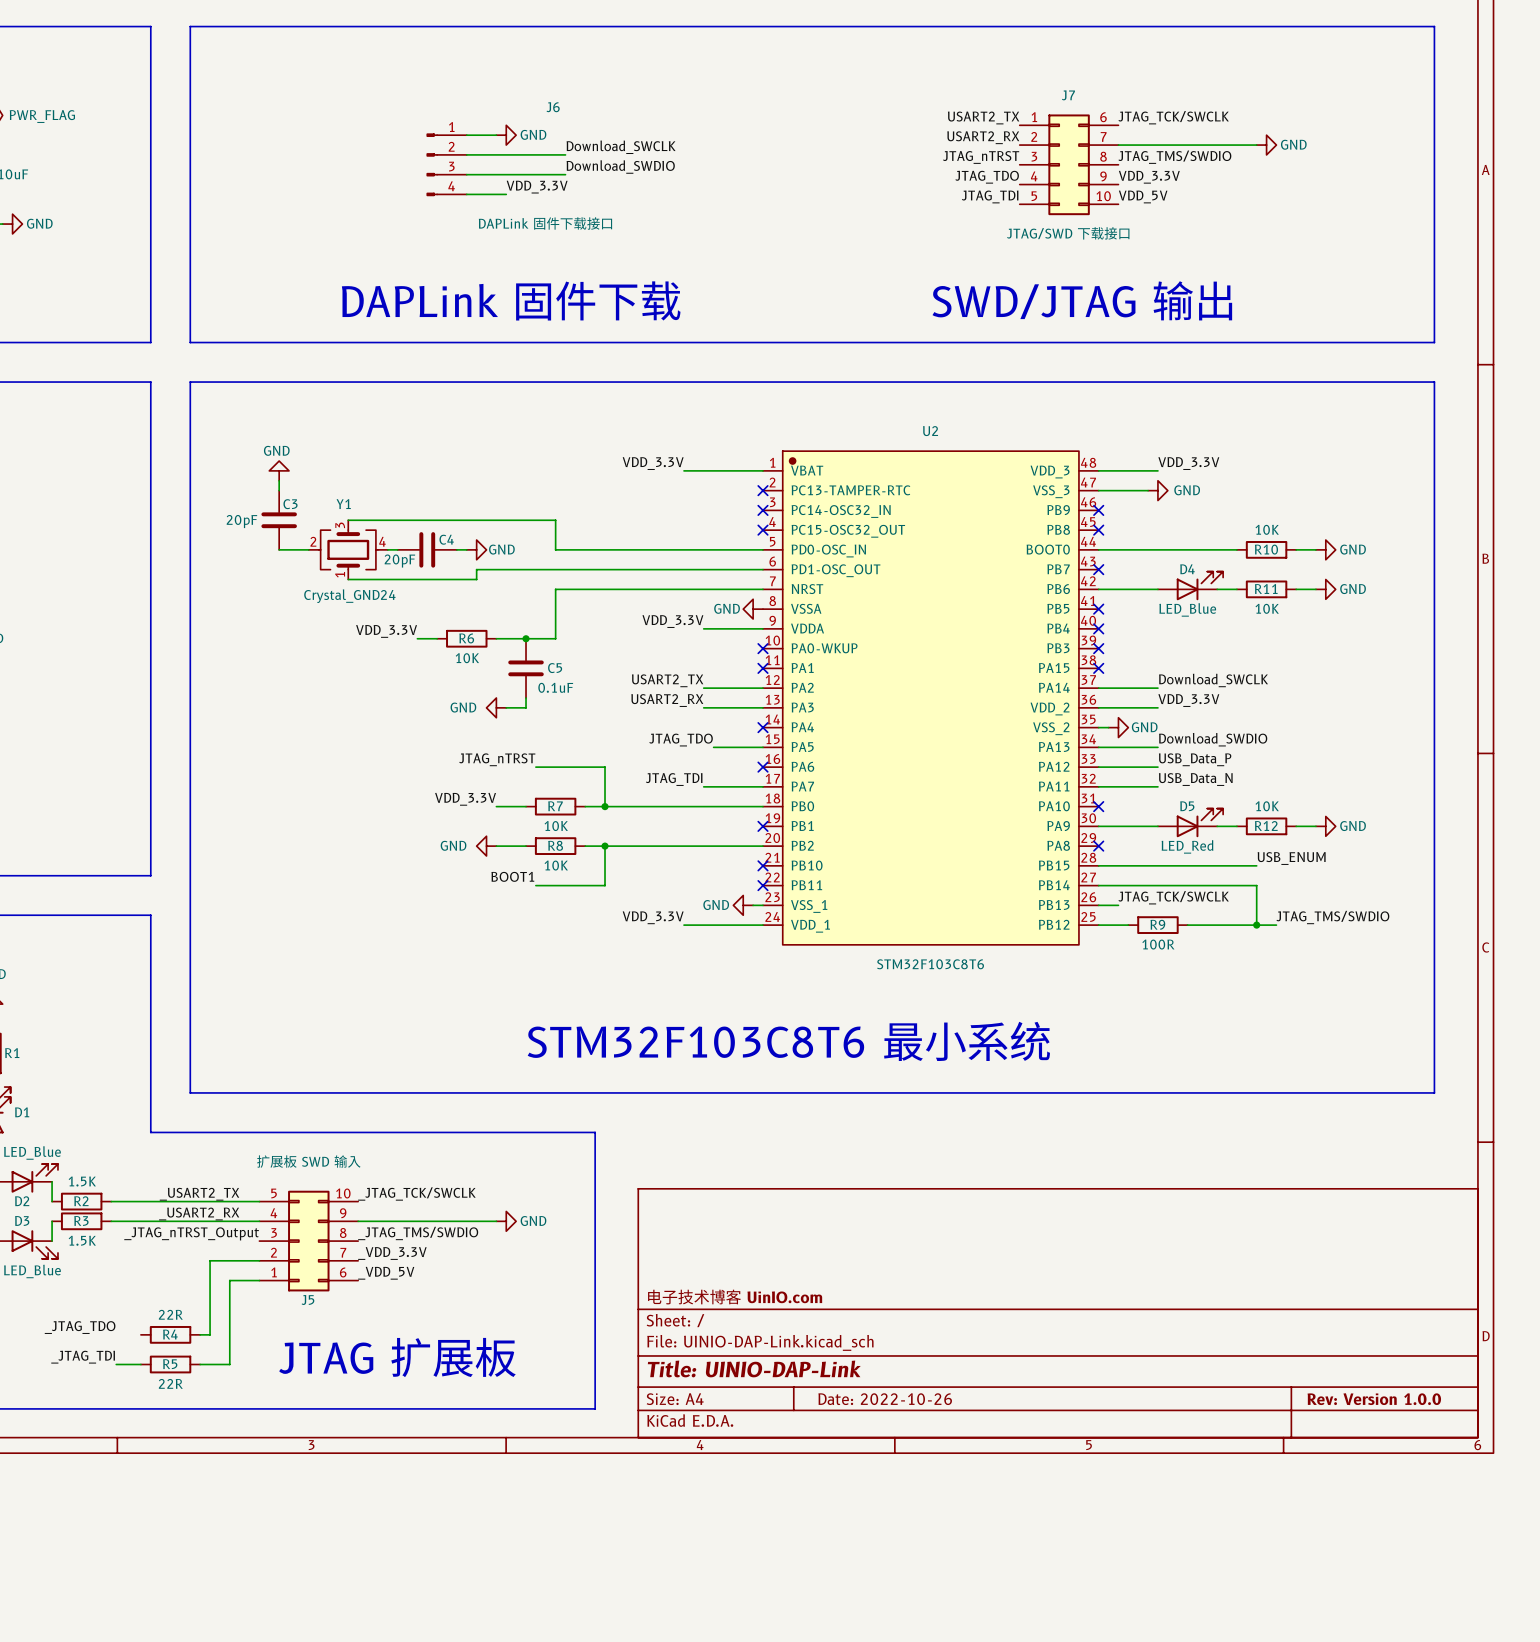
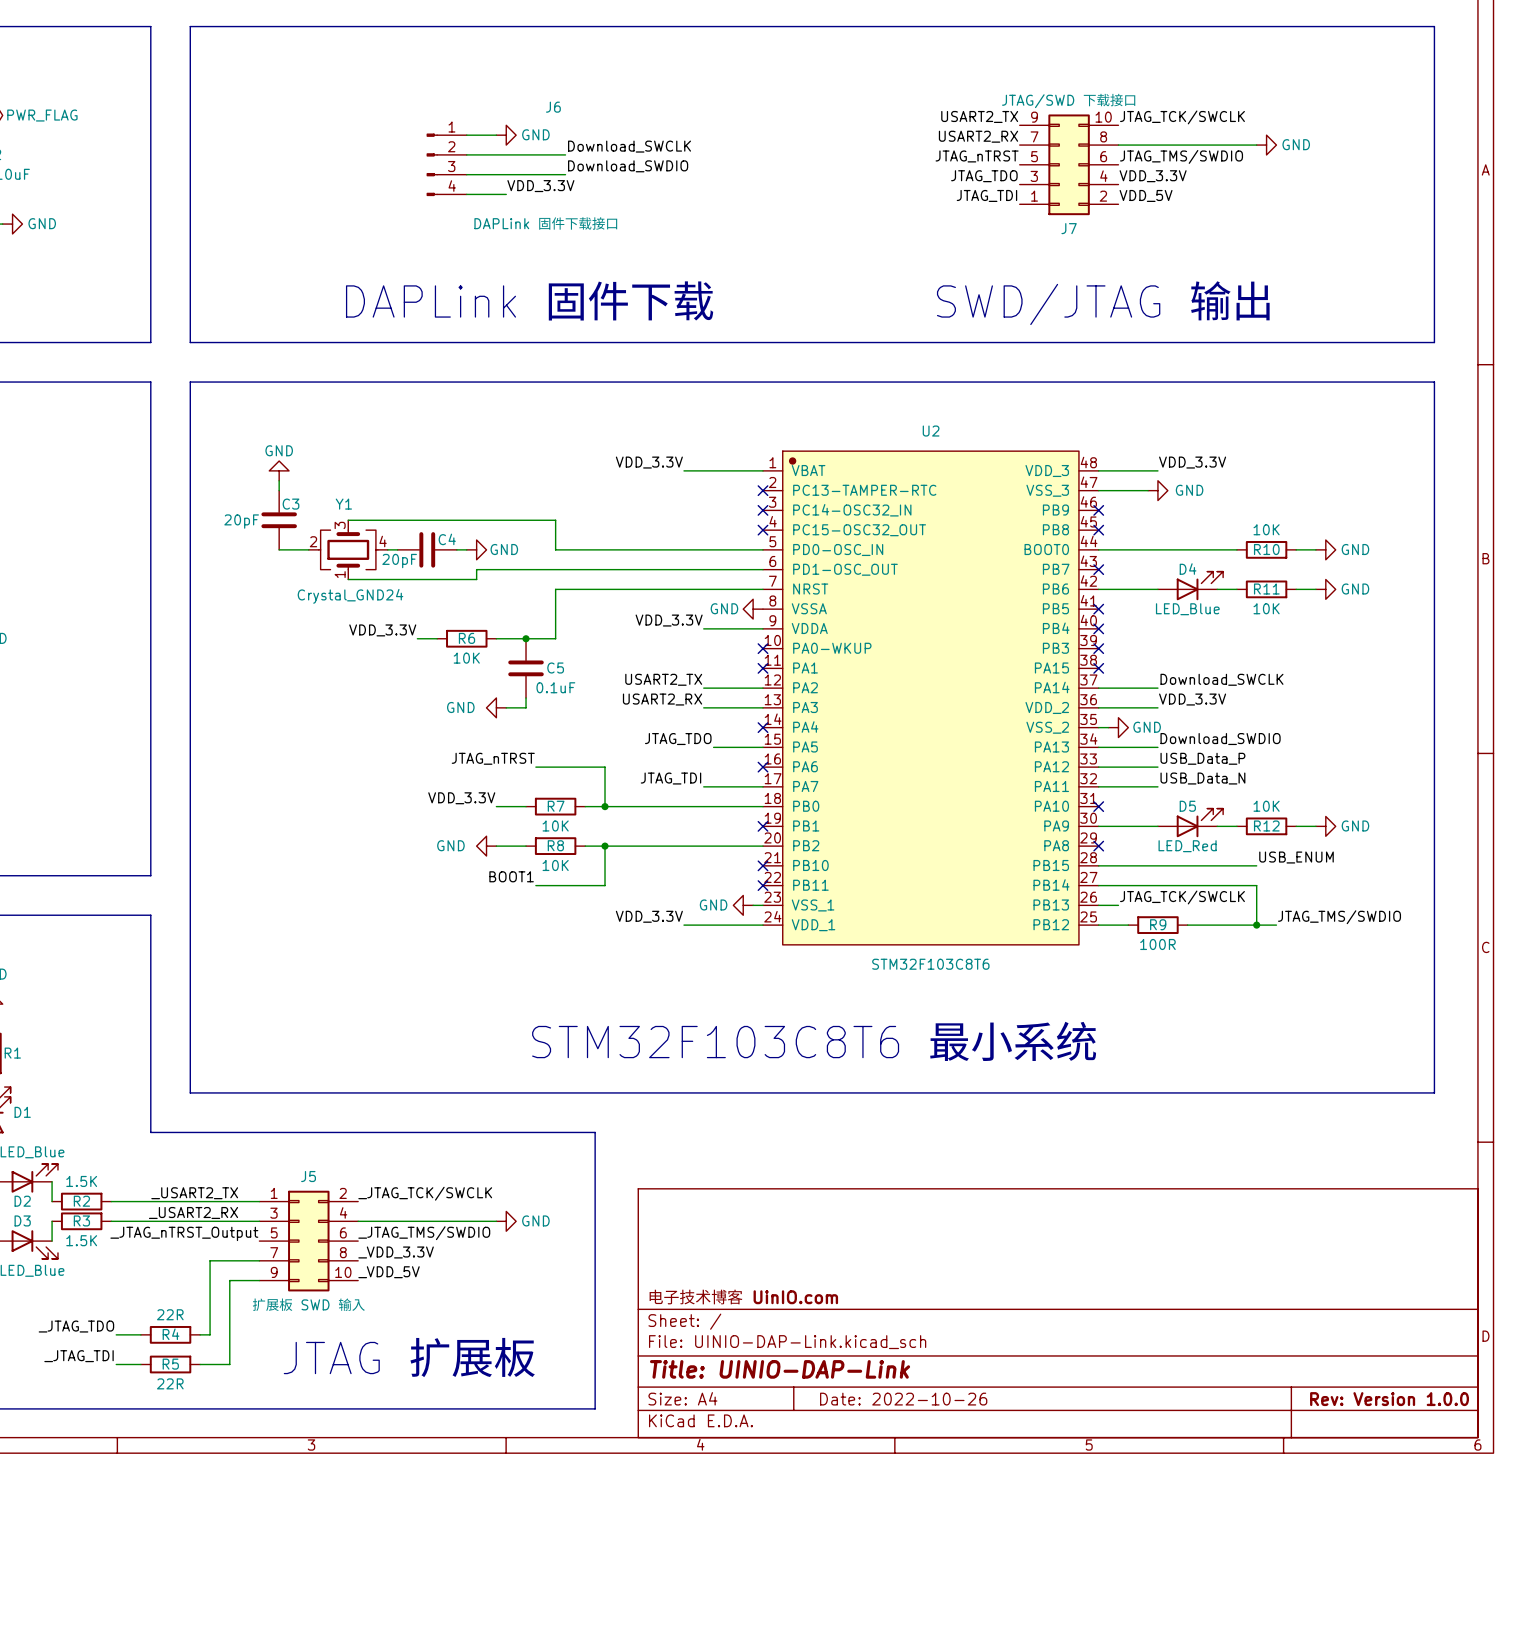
J7 name position: J7 (1068, 95) -> J7 (1069, 228)
J7 symbol: [1019, 114, 1119, 216] -> [1019, 114, 1119, 216]
J7 value position: JTAG/SWD 下载接口 (1068, 233) -> JTAG/SWD 下载接口 (1068, 100)
J5 value position: 扩展板 SWD 输入 (308, 1161) -> 扩展板 SWD 输入 (308, 1304)
J5 symbol: [259, 1190, 359, 1292] -> [259, 1190, 359, 1292]
J5 name position: J5 (307, 1300) -> J5 (308, 1176)
wire: none -> (116, 1334) (140, 1334)

